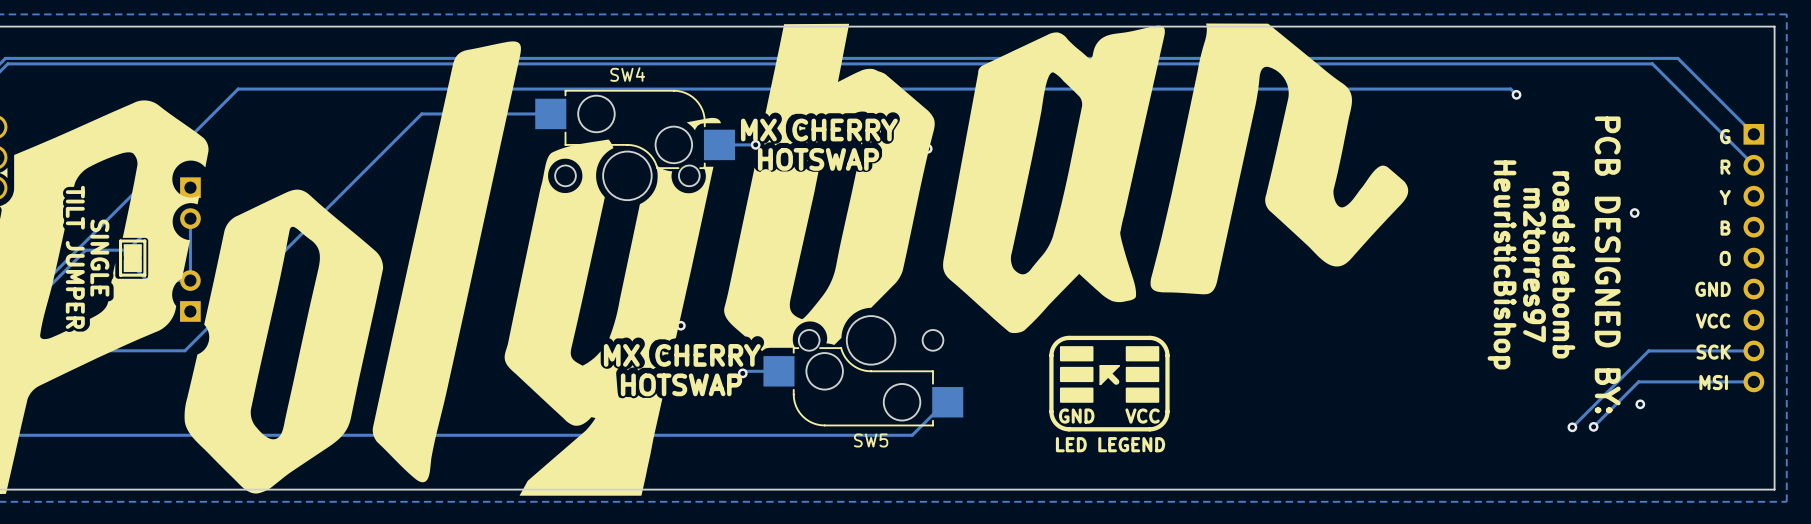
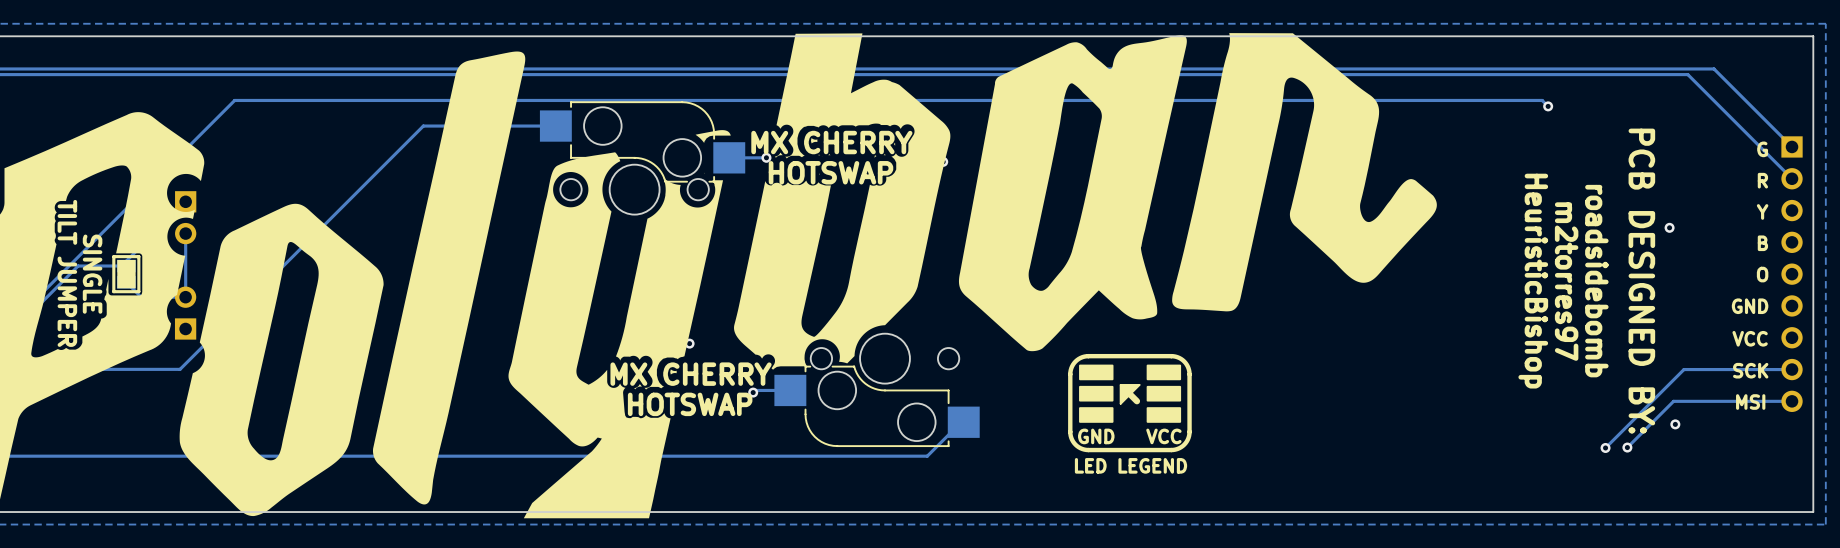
SW4 name: SW4 (627, 74) -> none
SW5 name: SW5 (871, 440) -> none

